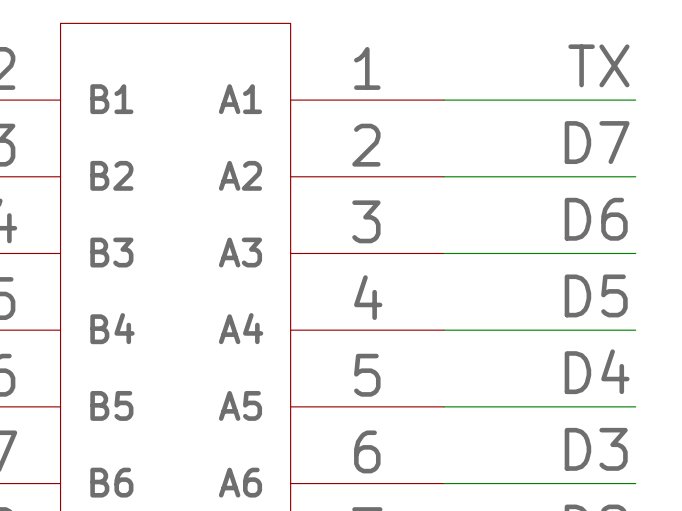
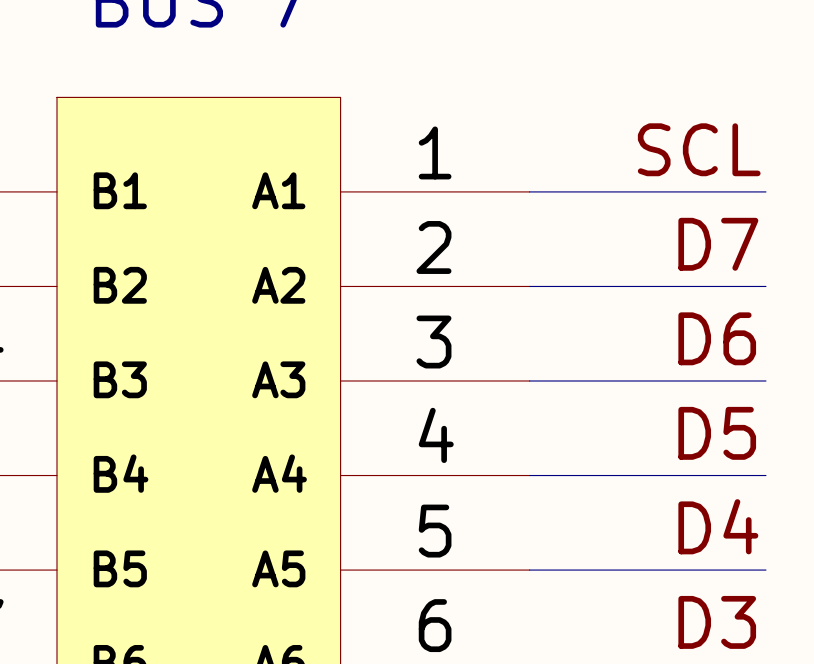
label: TX (598, 65) -> SCL (699, 149)

